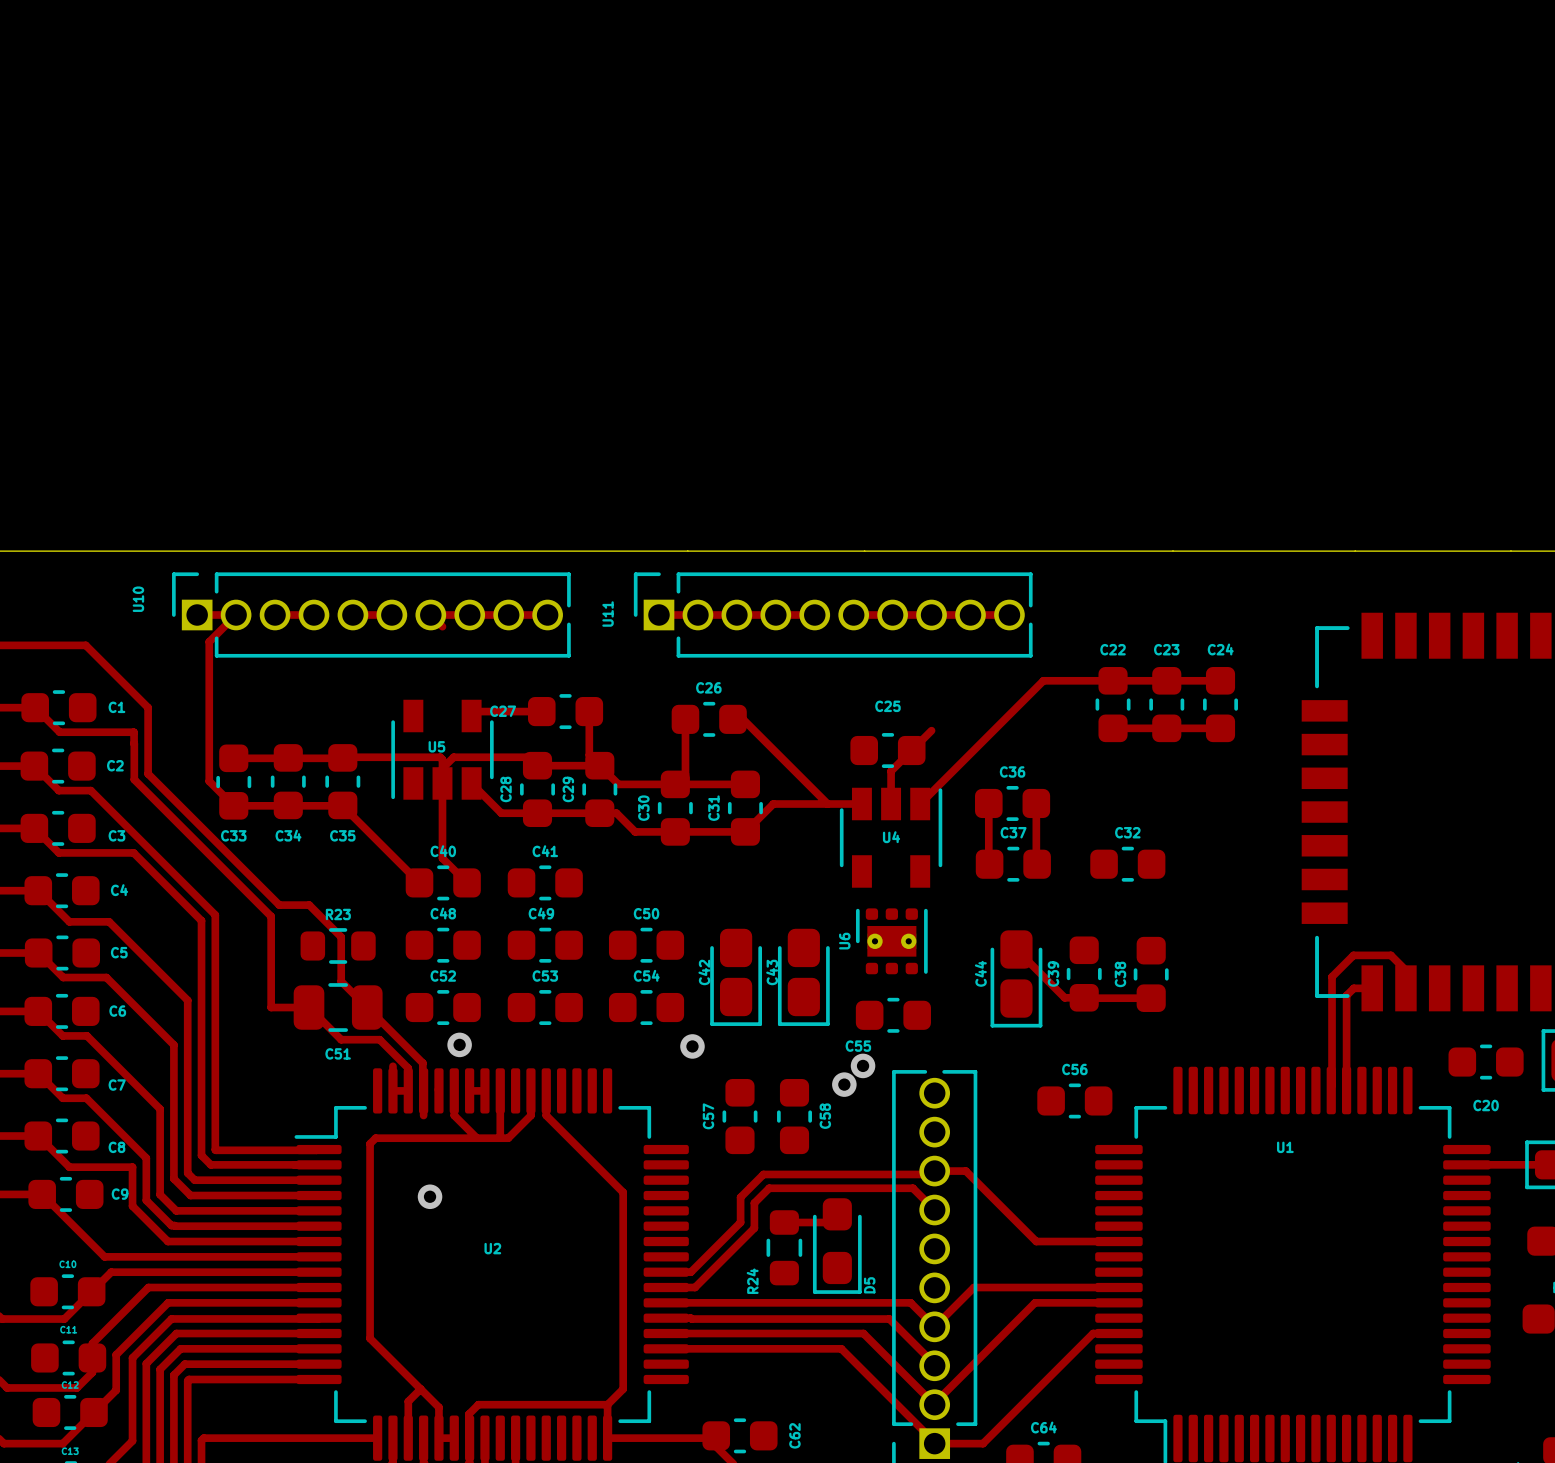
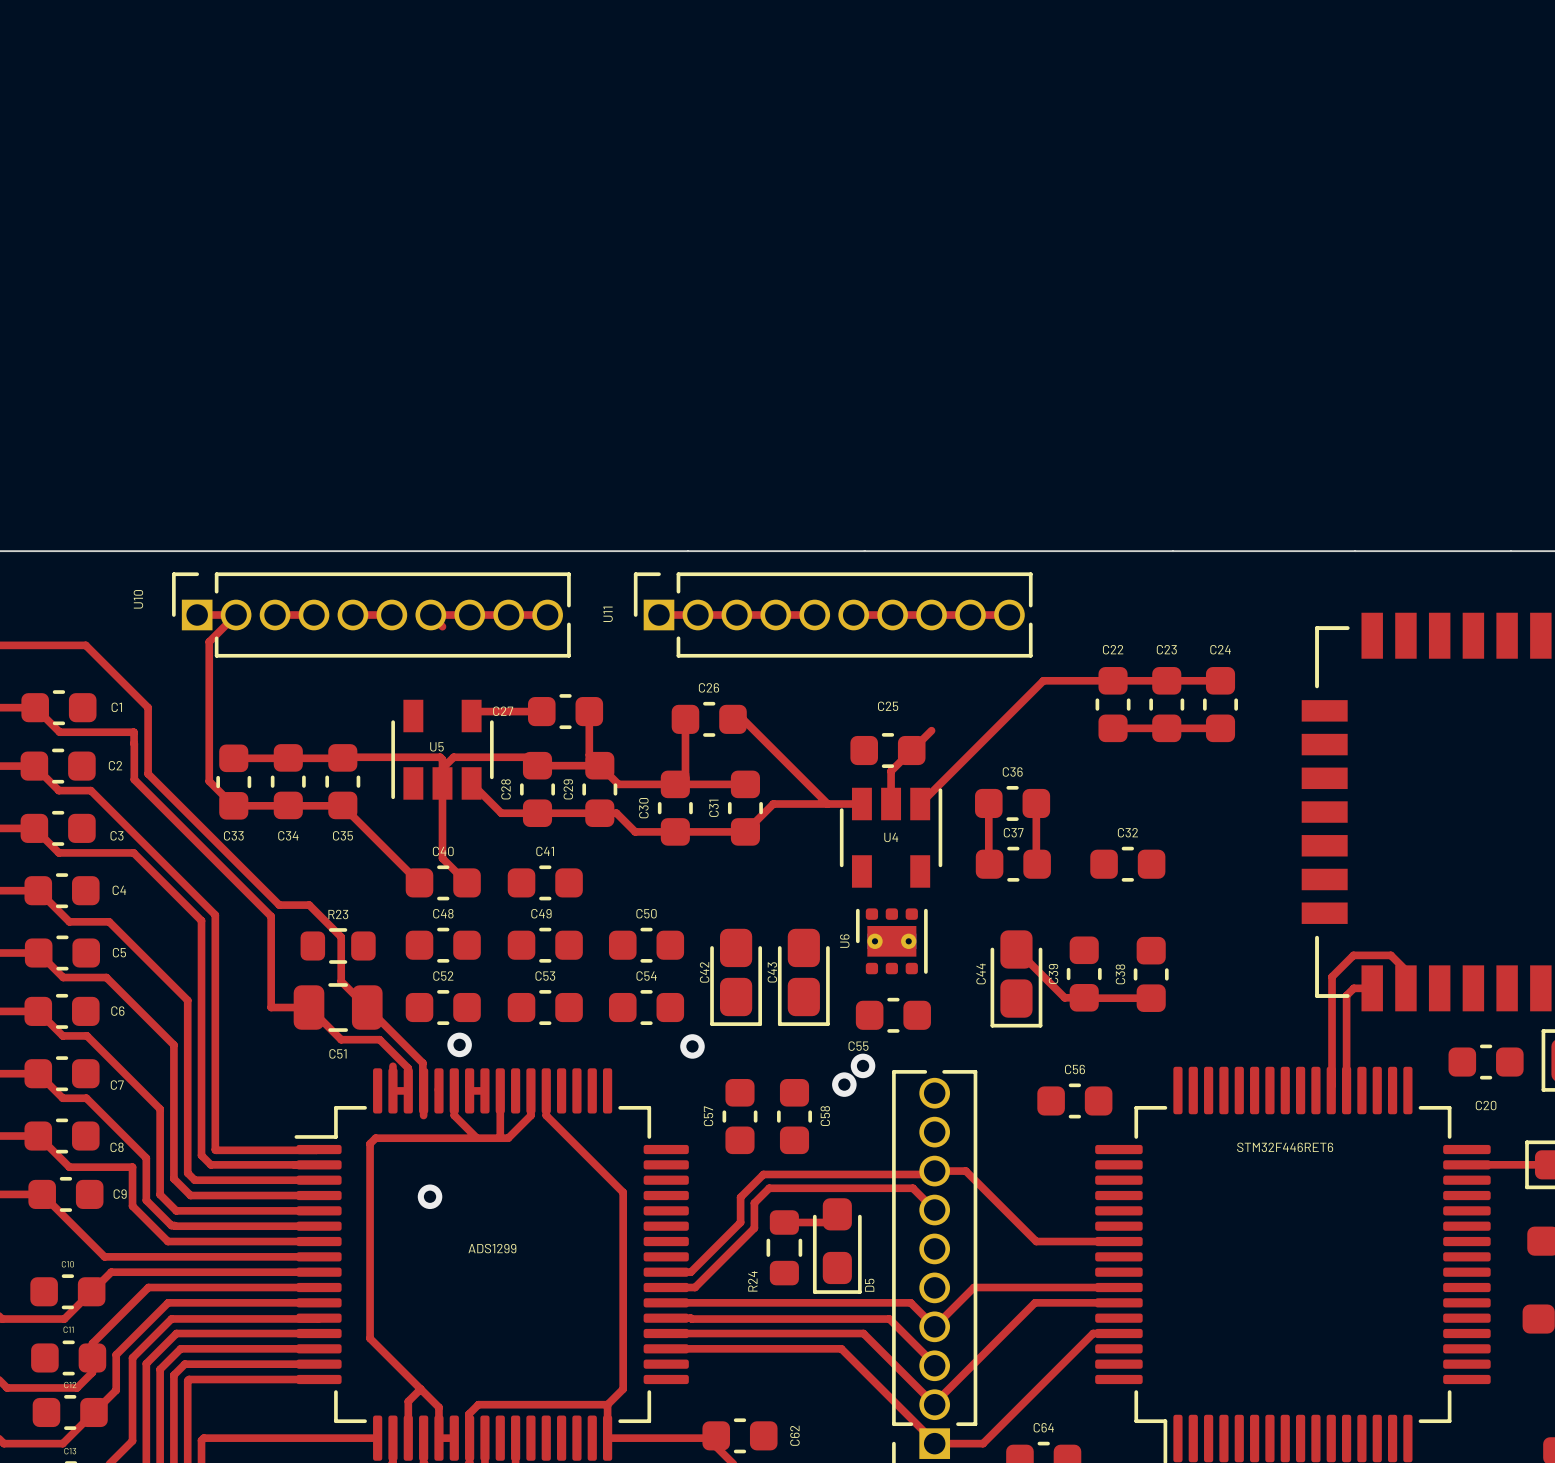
U1 name: U1 (1285, 1147) -> STM32F446RET6 (1285, 1147)
U2 name: U2 (492, 1248) -> ADS1299 (492, 1248)

